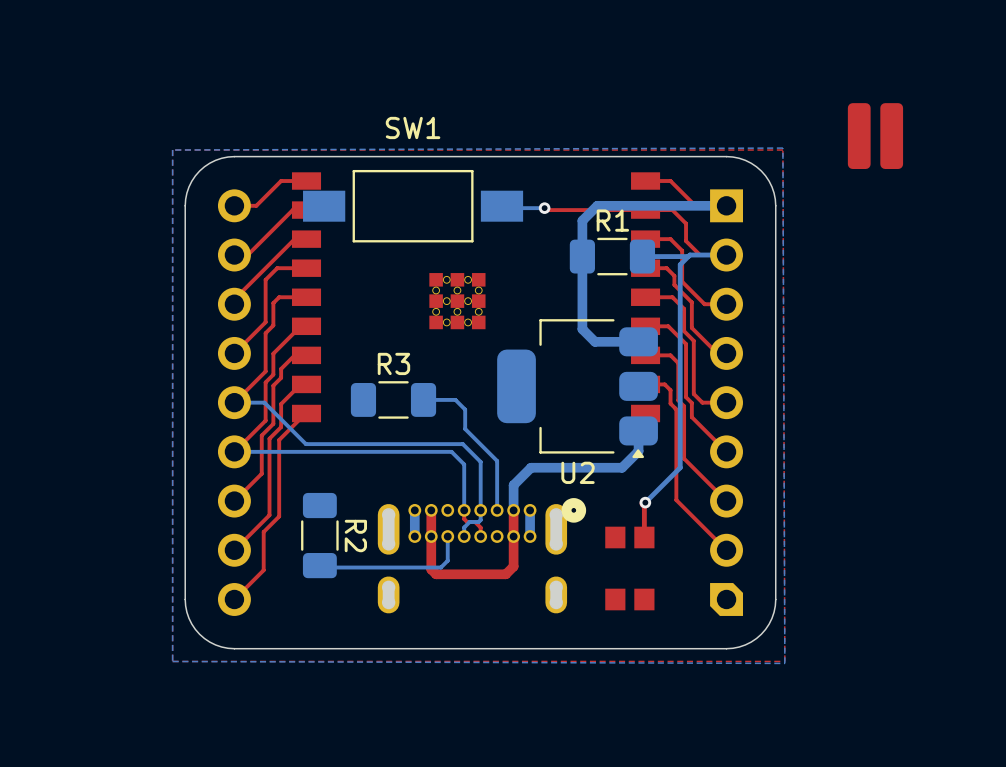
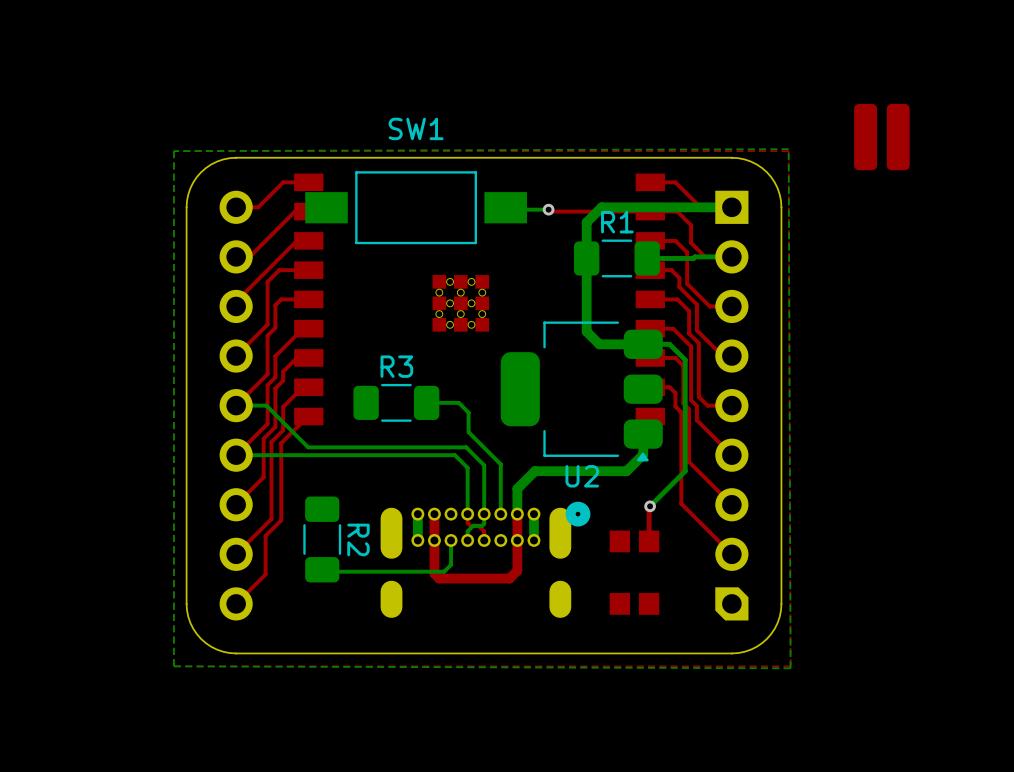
bottom track: (688, 256) (680, 264) (680, 357) -> (643, 344) (669, 344) (685, 359)

